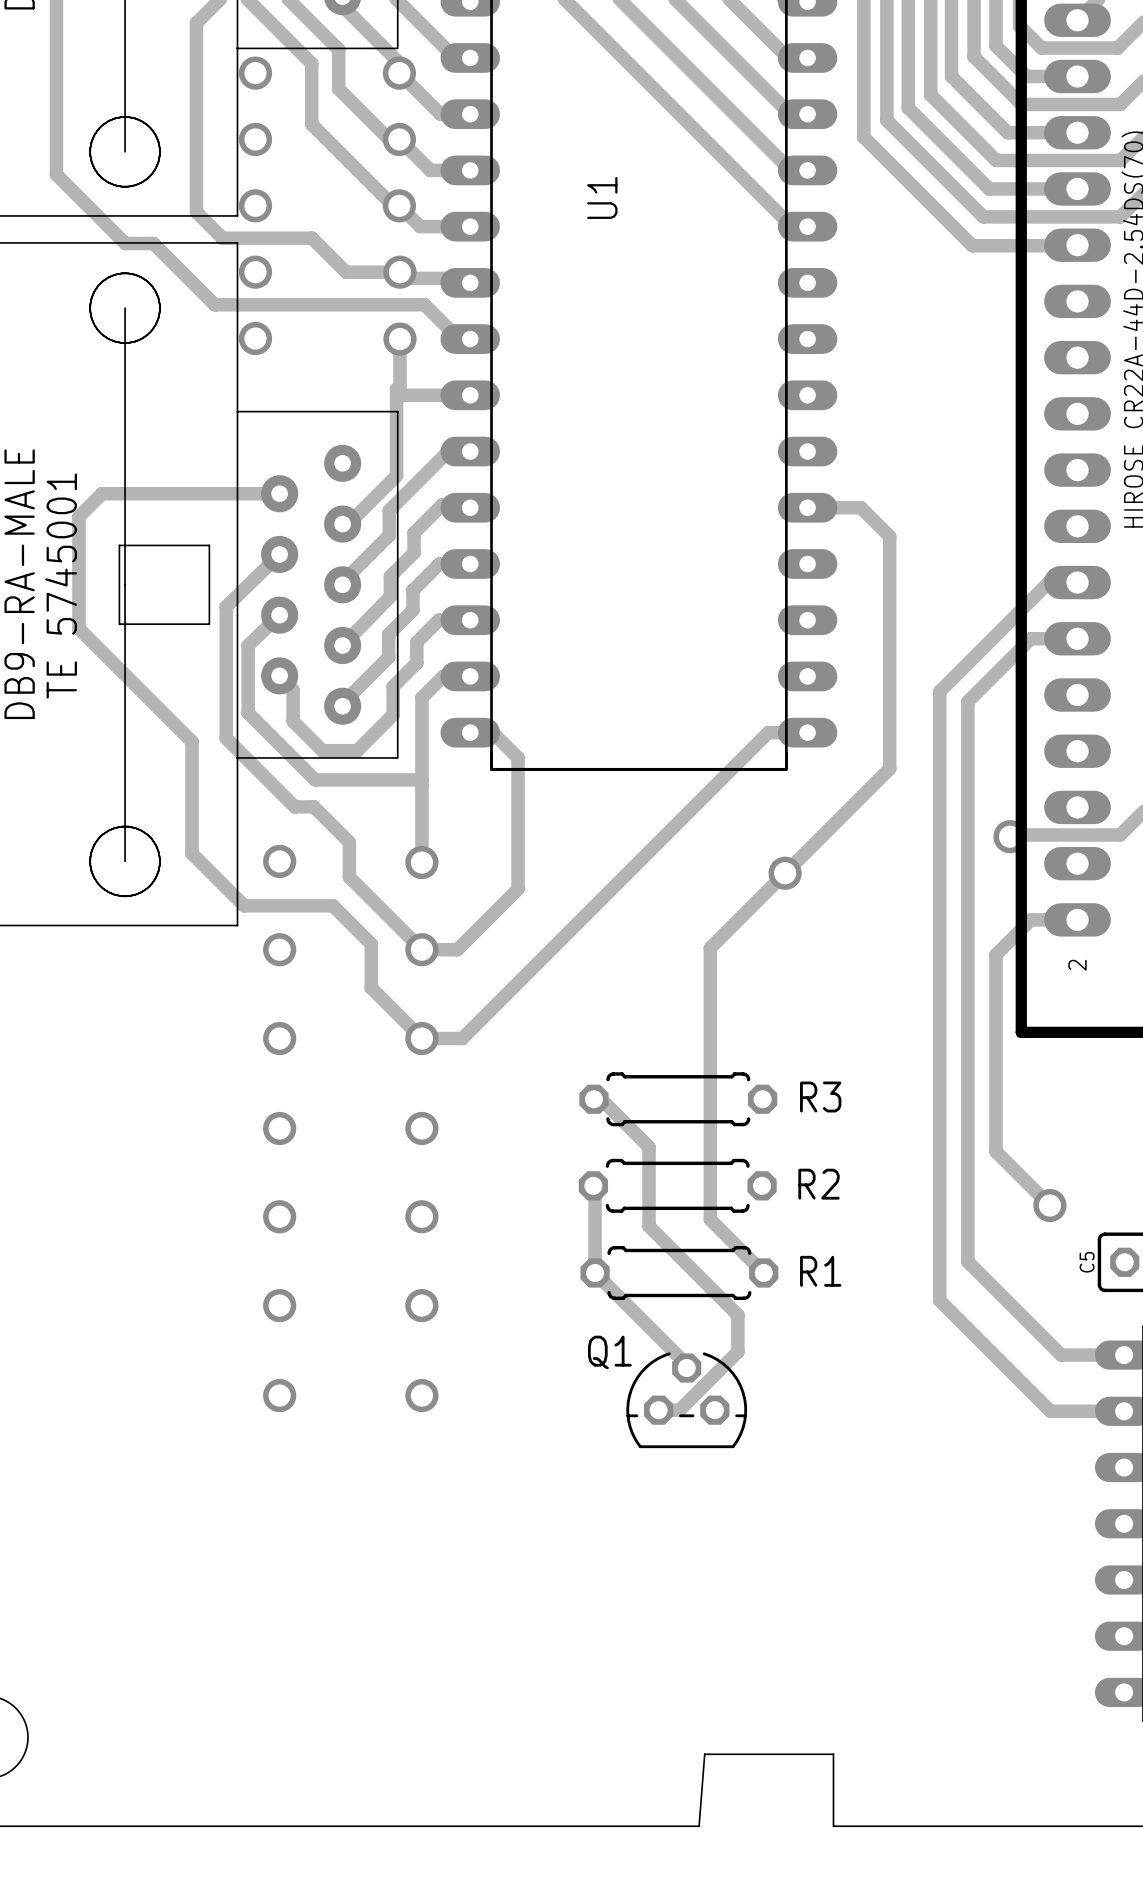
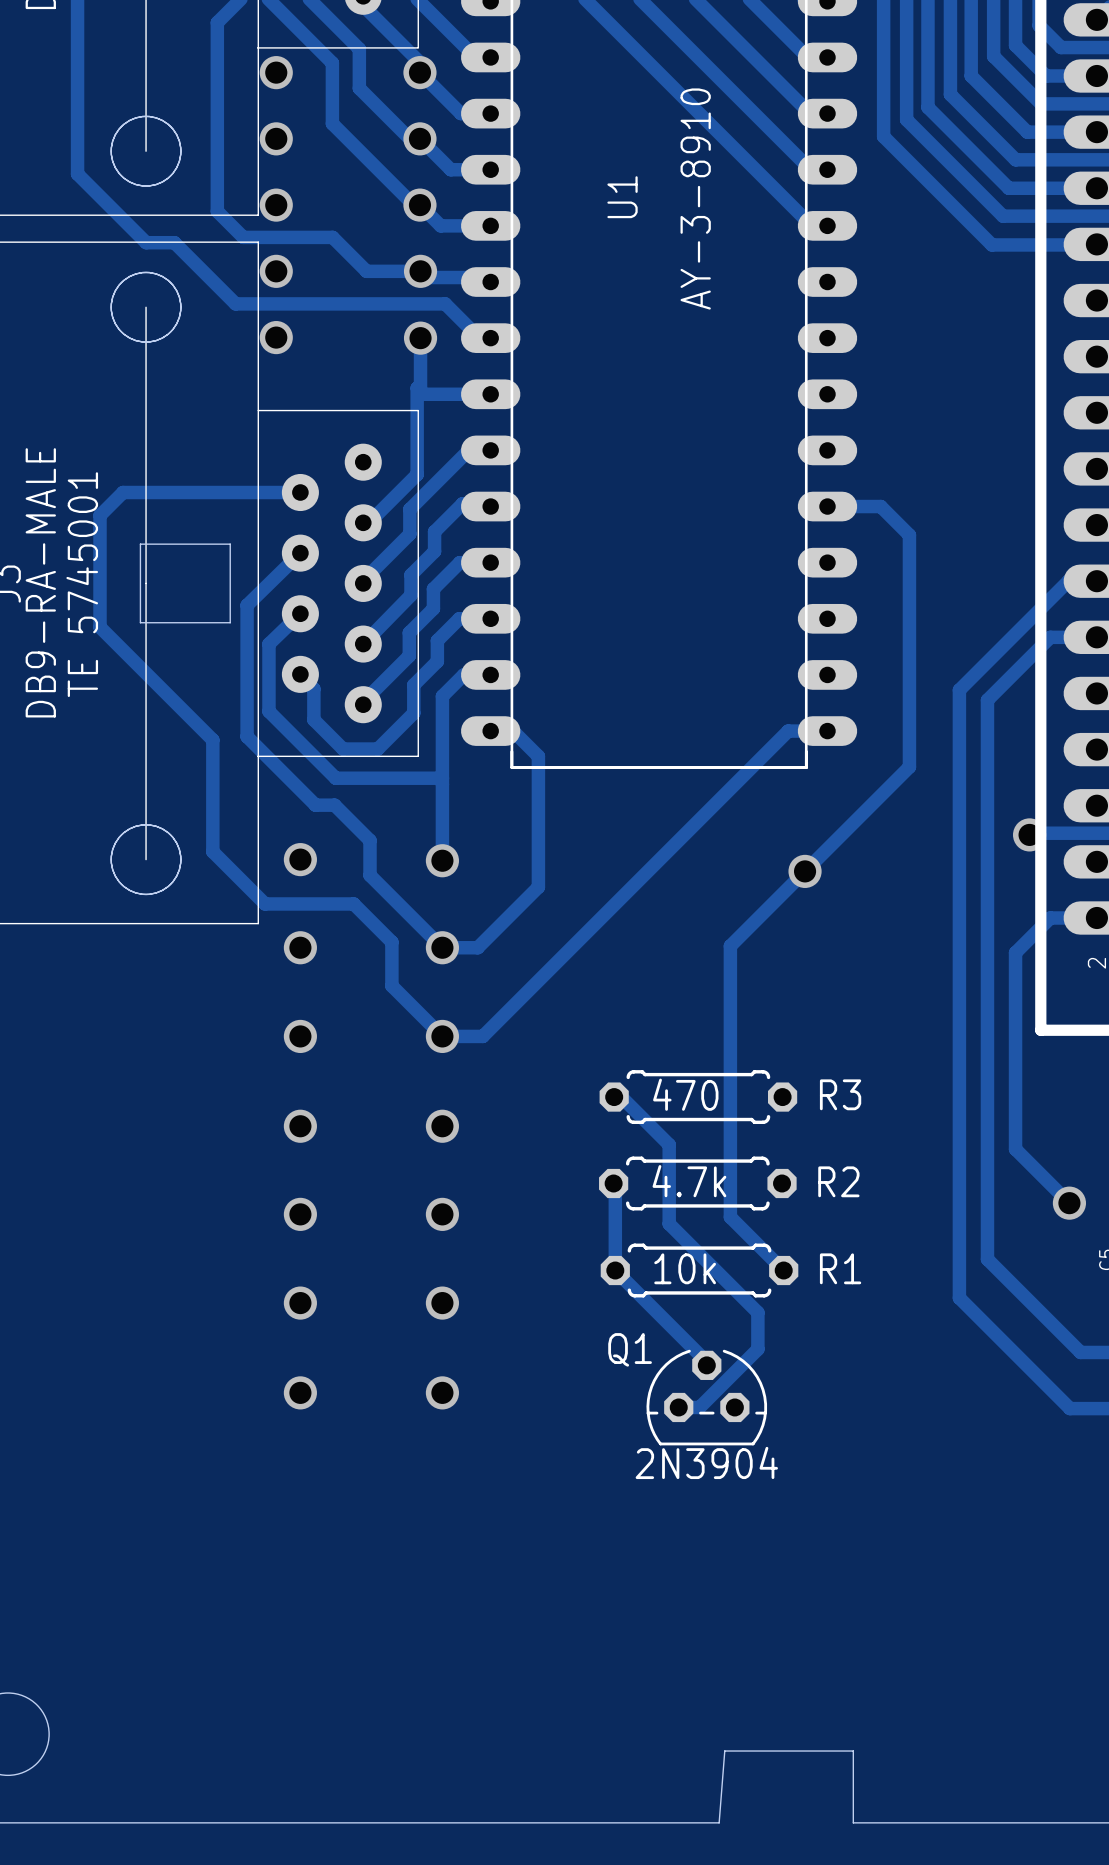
U1 value: none -> AY-3-8910 (695, 199)
R3 value: none -> 470 (685, 1094)
R2 value: none -> 4.7k (689, 1181)
R1 value: none -> 10k (685, 1268)
Q1 value: none -> 2N3904 (706, 1462)

